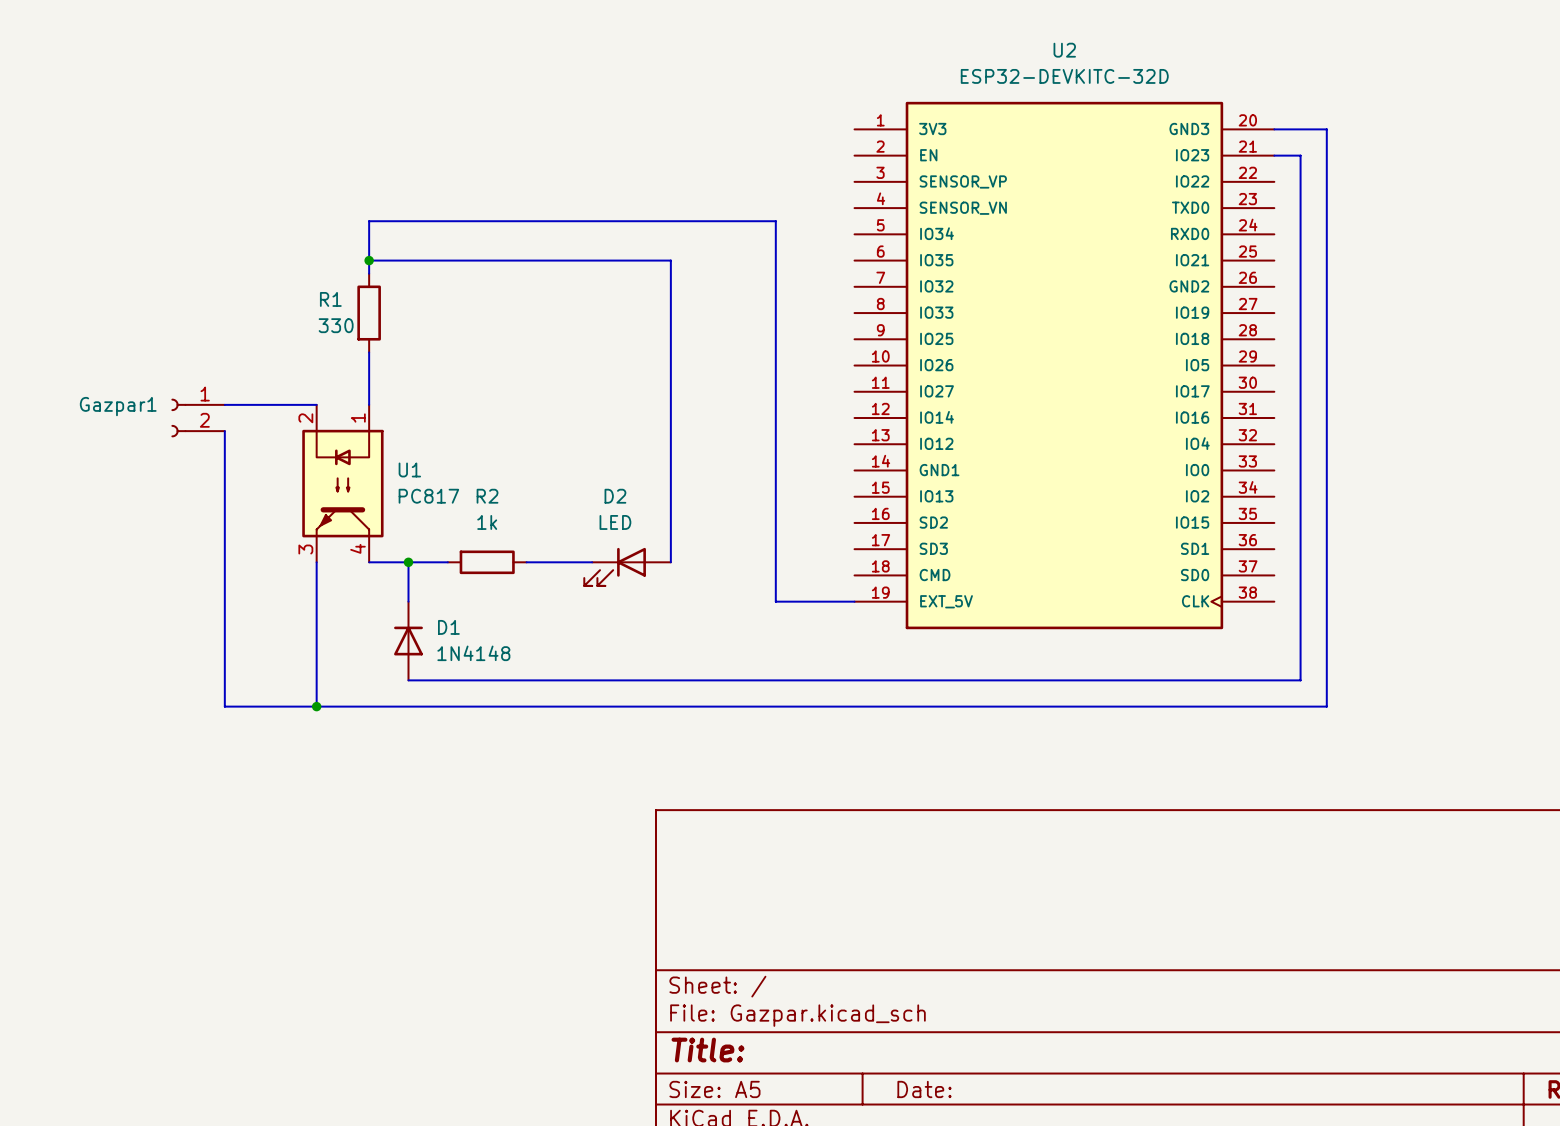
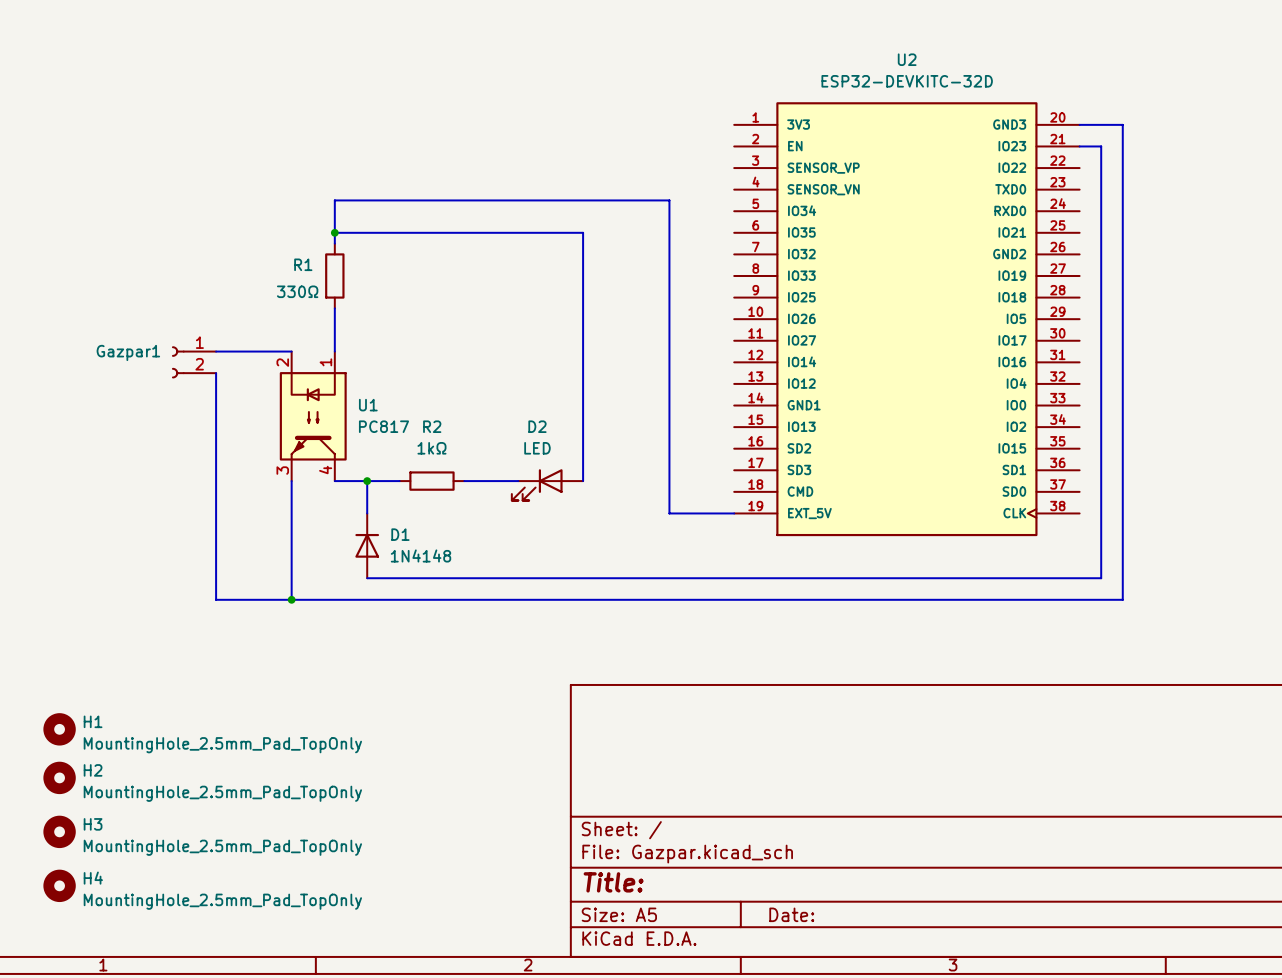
R1 value: 330 (336, 325) -> 330Ω (297, 291)
R2 value: 1k (487, 522) -> 1kΩ (431, 448)
H1: none -> MountingHole_2.5mm_Pad_TopOnly (59, 729)
H2: none -> MountingHole_2.5mm_Pad_TopOnly (59, 777)
H3: none -> MountingHole_2.5mm_Pad_TopOnly (59, 831)
H4: none -> MountingHole_2.5mm_Pad_TopOnly (59, 885)

